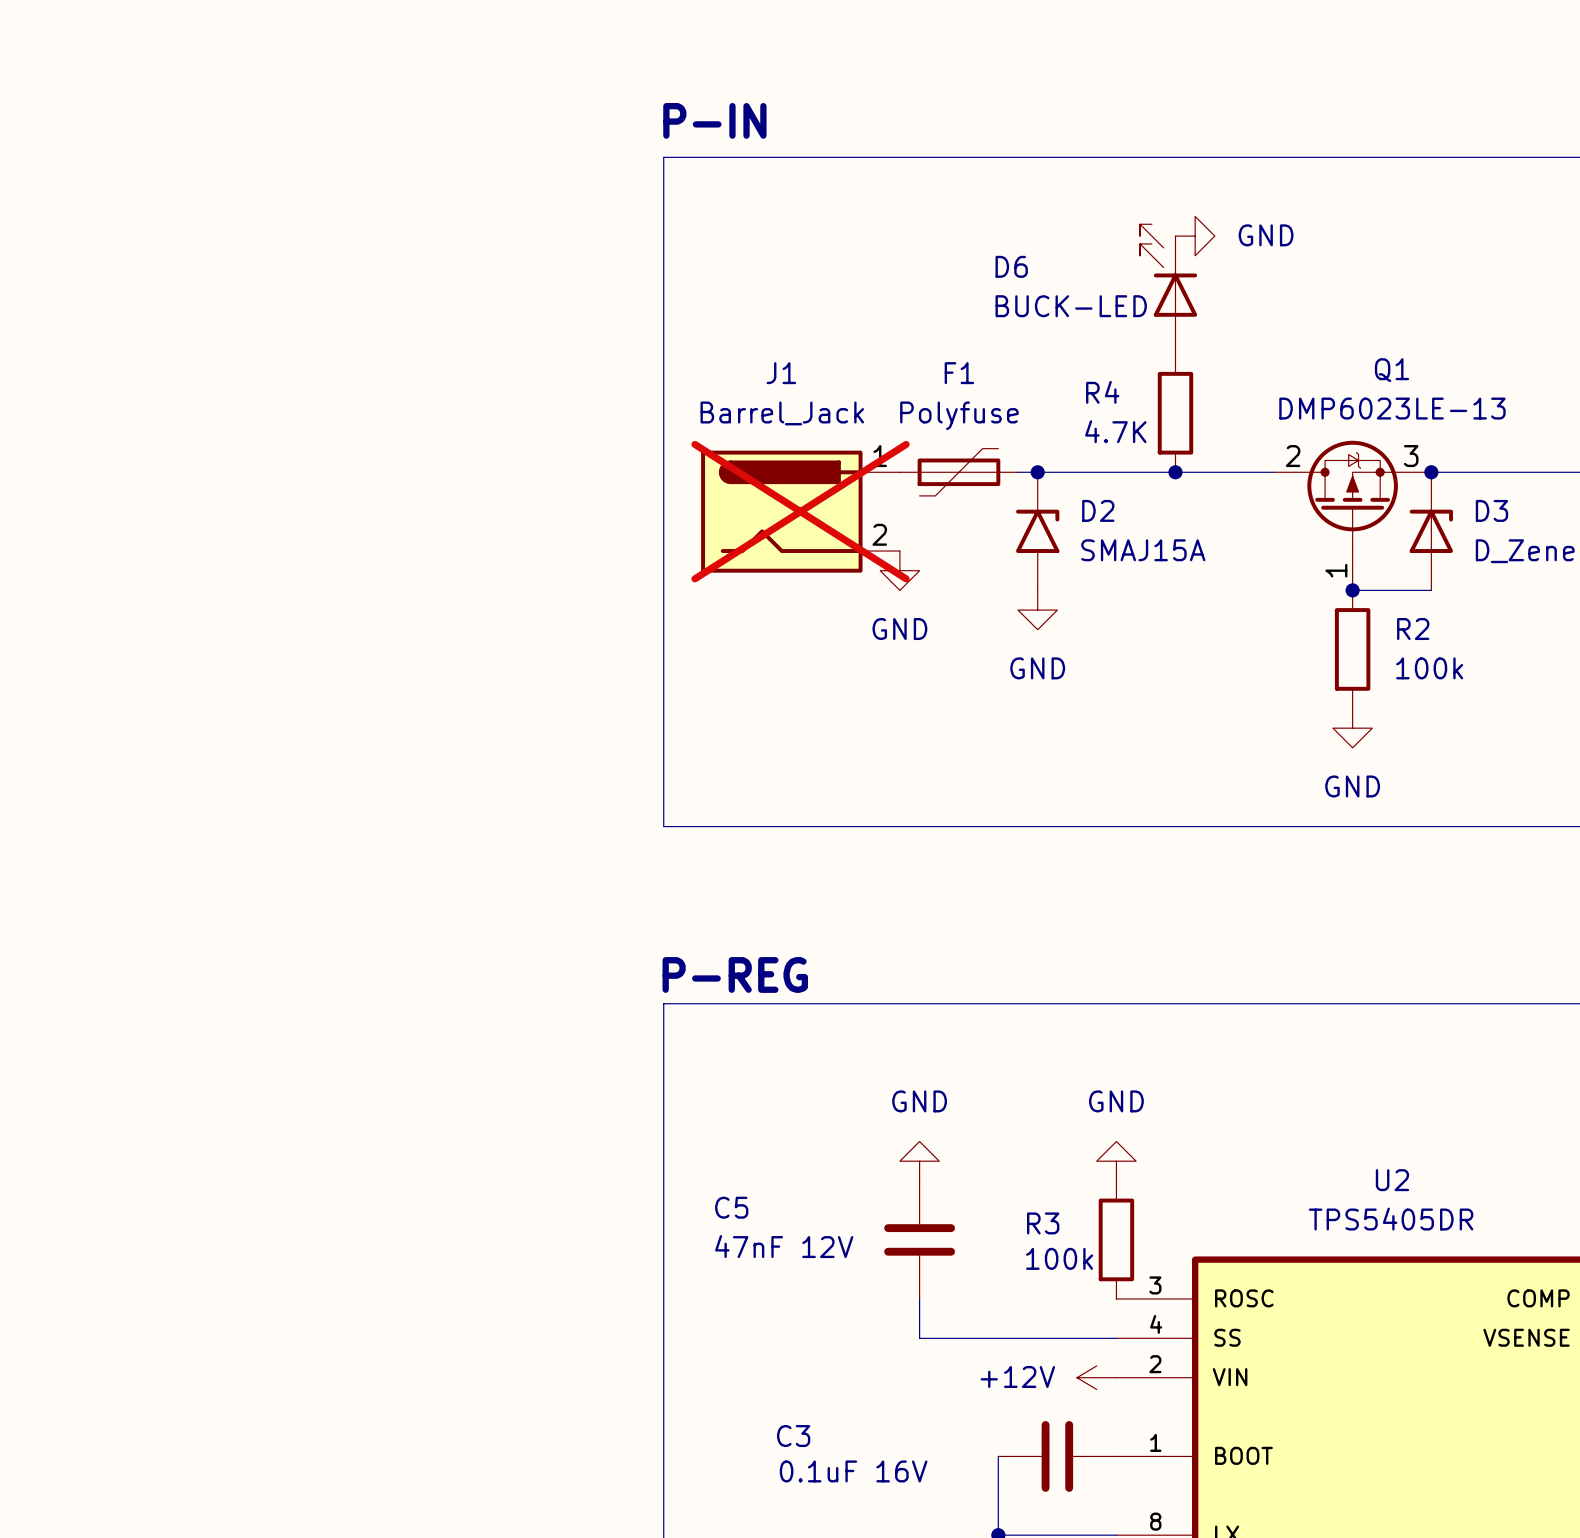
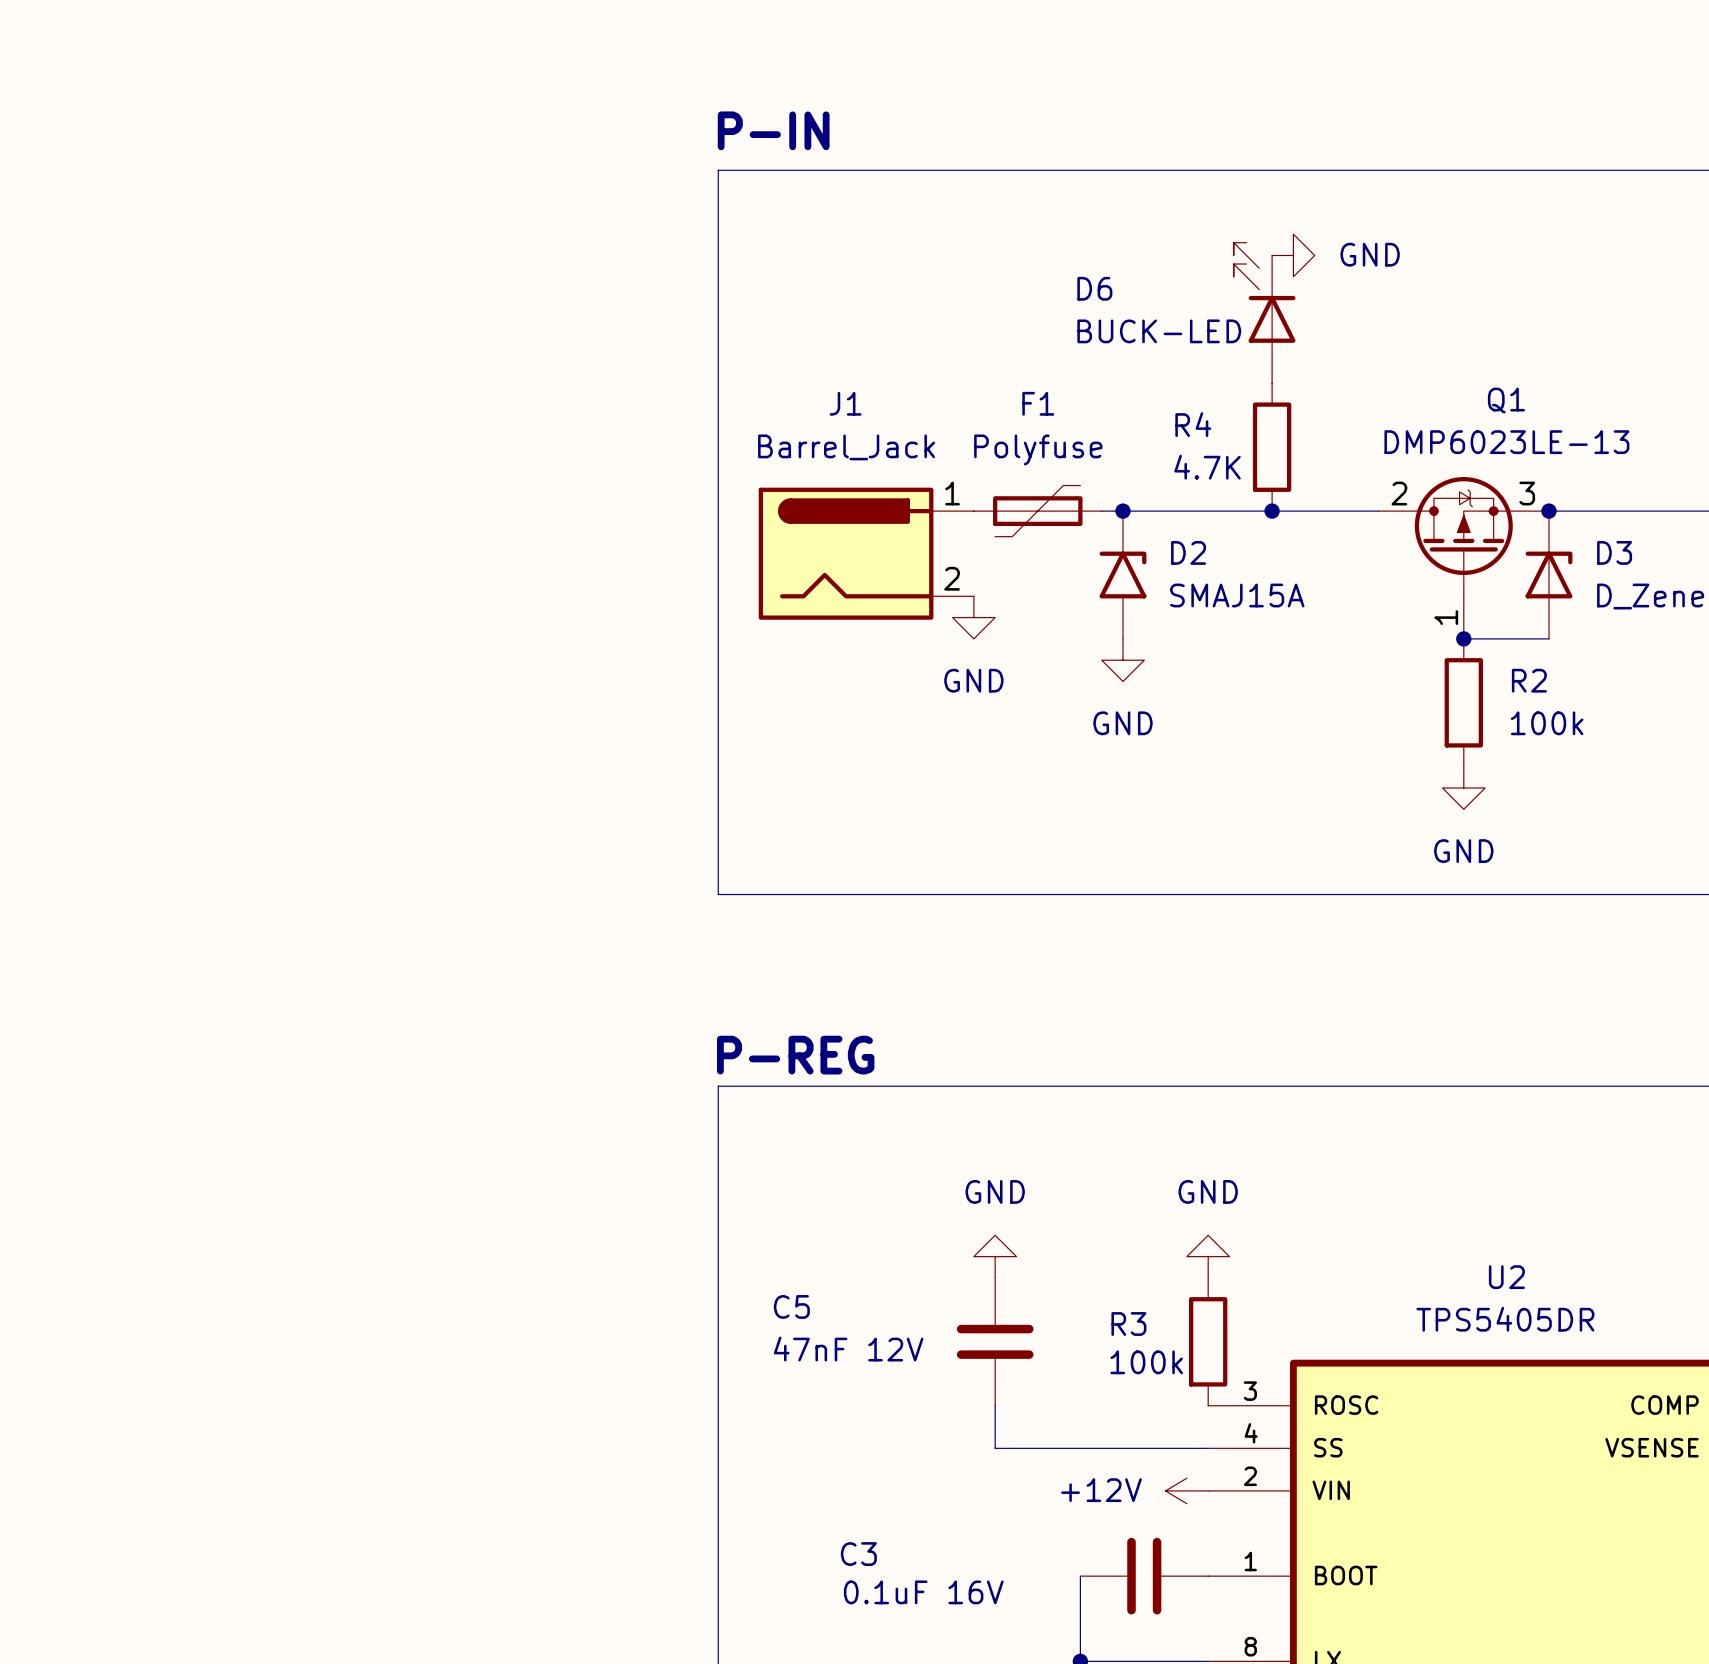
J1 do-not-place cross: (800, 511) -> none

